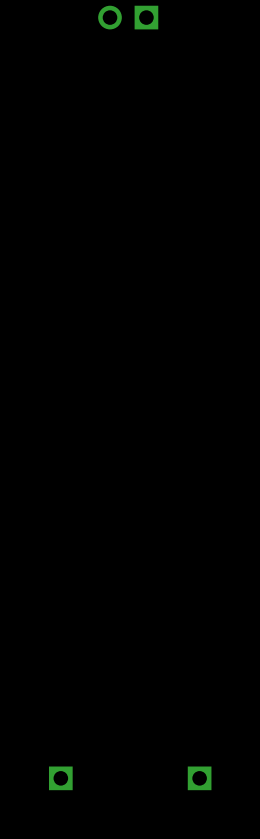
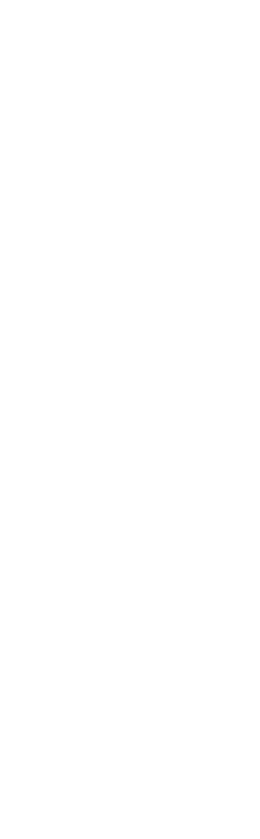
part: (128, 17) -> none
part: (60, 778) -> none
part: (199, 778) -> none

